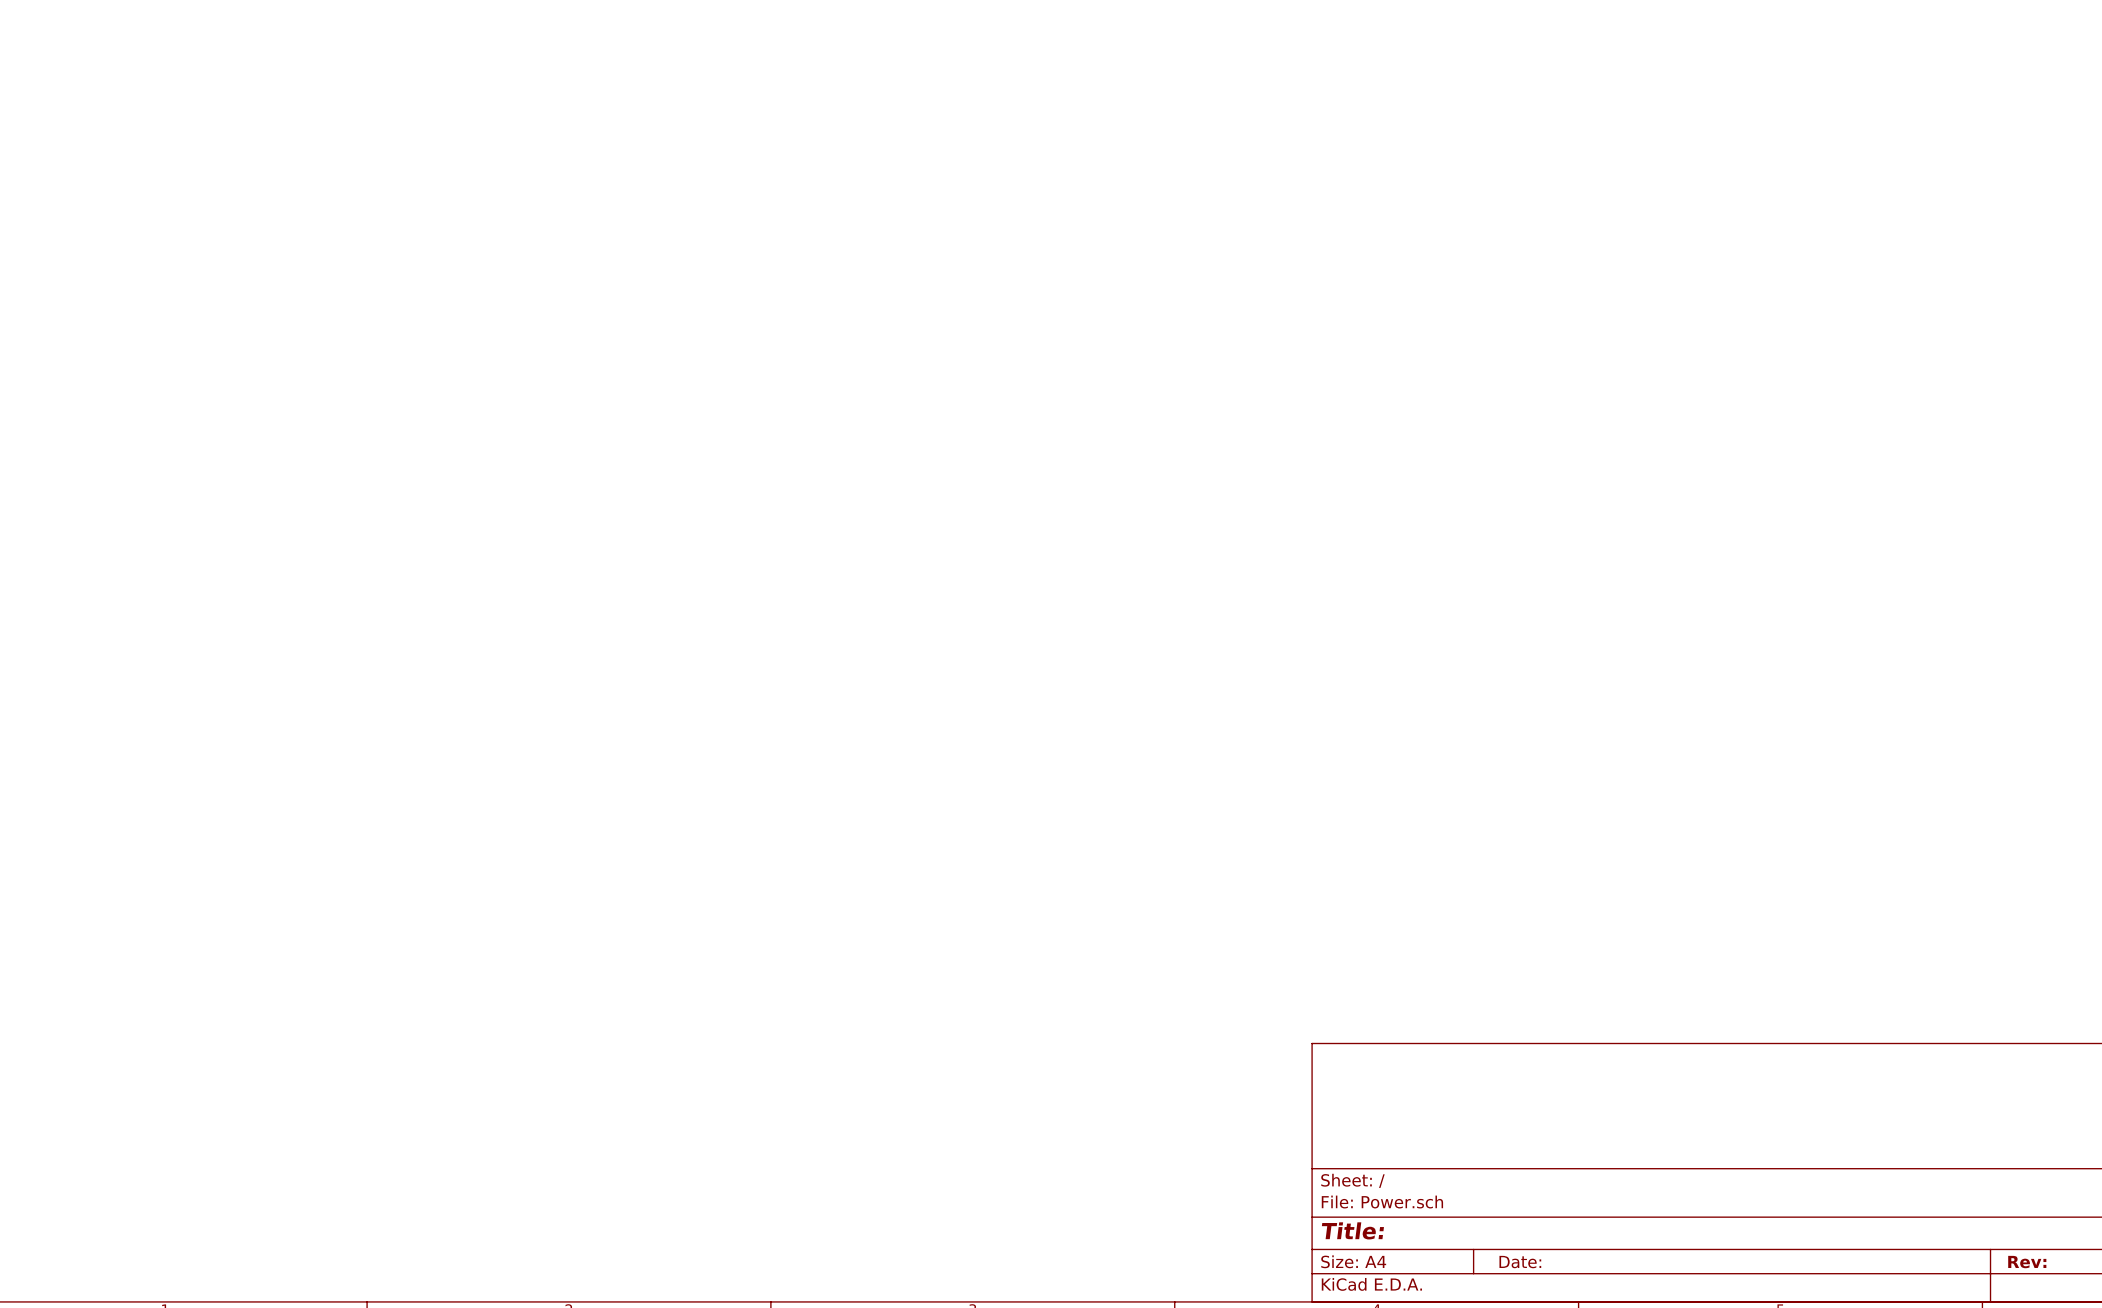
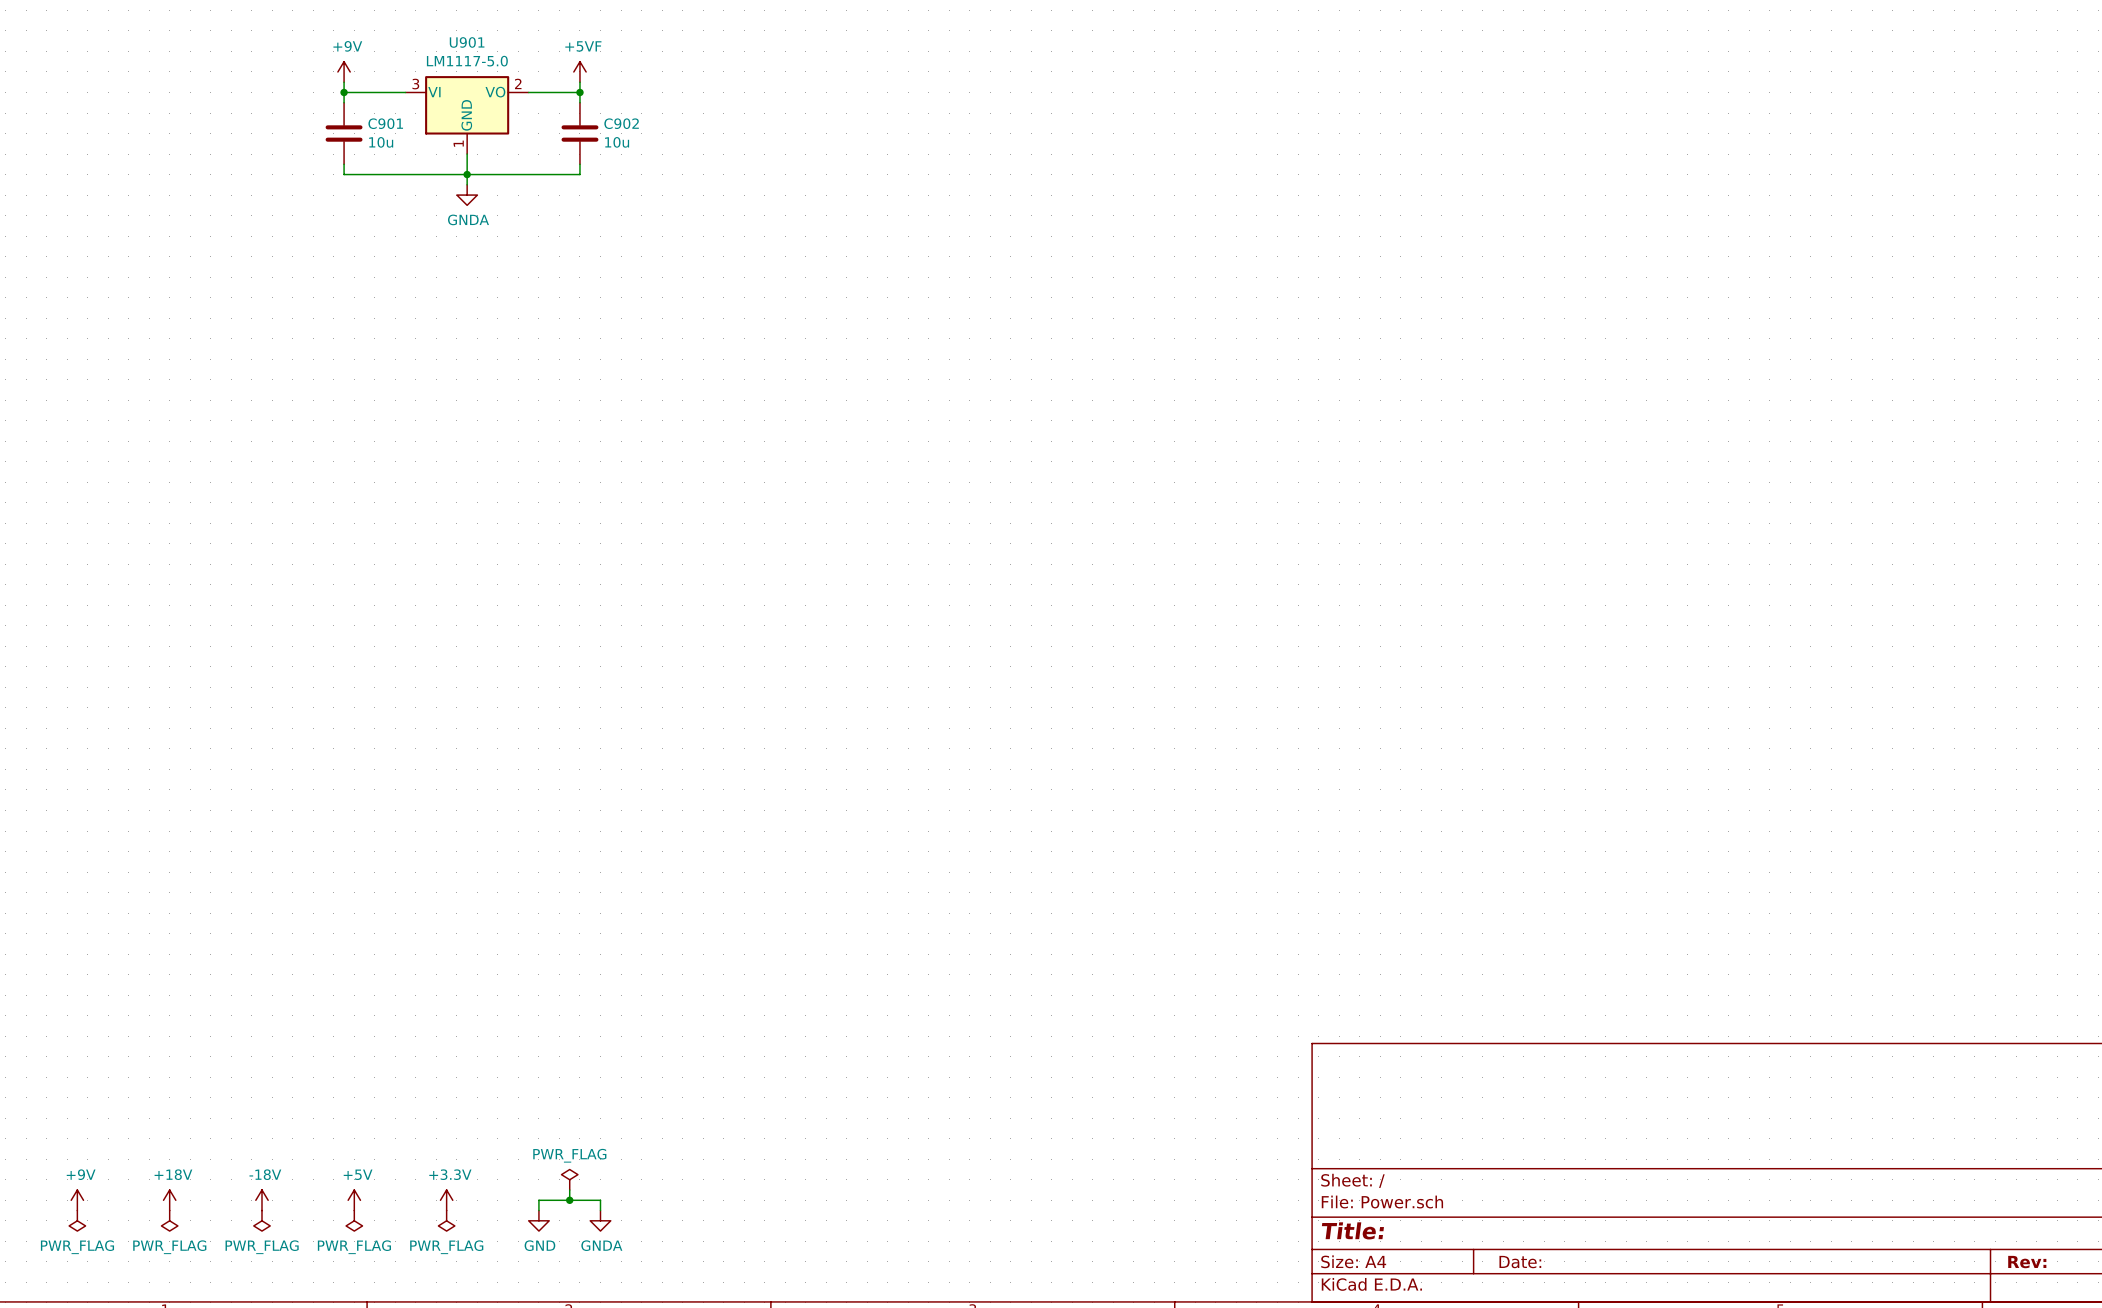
power symbol: none -> +9V (344, 71)
power symbol: none -> +5VF (579, 71)
wire: none -> (344, 82) (344, 102)
wire: none -> (579, 82) (579, 102)
wire: none -> (344, 92) (405, 92)
junction: none -> (344, 92)
wire: none -> (528, 92) (579, 92)
junction: none -> (579, 92)
U901: none -> LM1117-5.0 (467, 115)
C901: none -> 10u (344, 133)
C902: none -> 10u (579, 133)
wire: none -> (467, 154) (467, 184)
wire: none -> (344, 164) (344, 174) (579, 174) (579, 164)
junction: none -> (467, 174)
power symbol: none -> GNDA (467, 195)
power symbol: none -> PWR_FLAG (569, 1179)
wire: none -> (569, 1190) (569, 1200)
power symbol: none -> +9V (77, 1200)
power symbol: none -> +18V (169, 1200)
power symbol: none -> -18V (261, 1200)
power symbol: none -> +5V (354, 1200)
power symbol: none -> +3.3V (446, 1200)
junction: none -> (569, 1200)
wire: none -> (538, 1210) (538, 1200) (600, 1200) (600, 1210)
power symbol: none -> PWR_FLAG (77, 1220)
power symbol: none -> PWR_FLAG (169, 1220)
power symbol: none -> PWR_FLAG (261, 1220)
power symbol: none -> PWR_FLAG (354, 1220)
power symbol: none -> PWR_FLAG (446, 1220)
power symbol: none -> GND (538, 1220)
power symbol: none -> GNDA (600, 1220)

